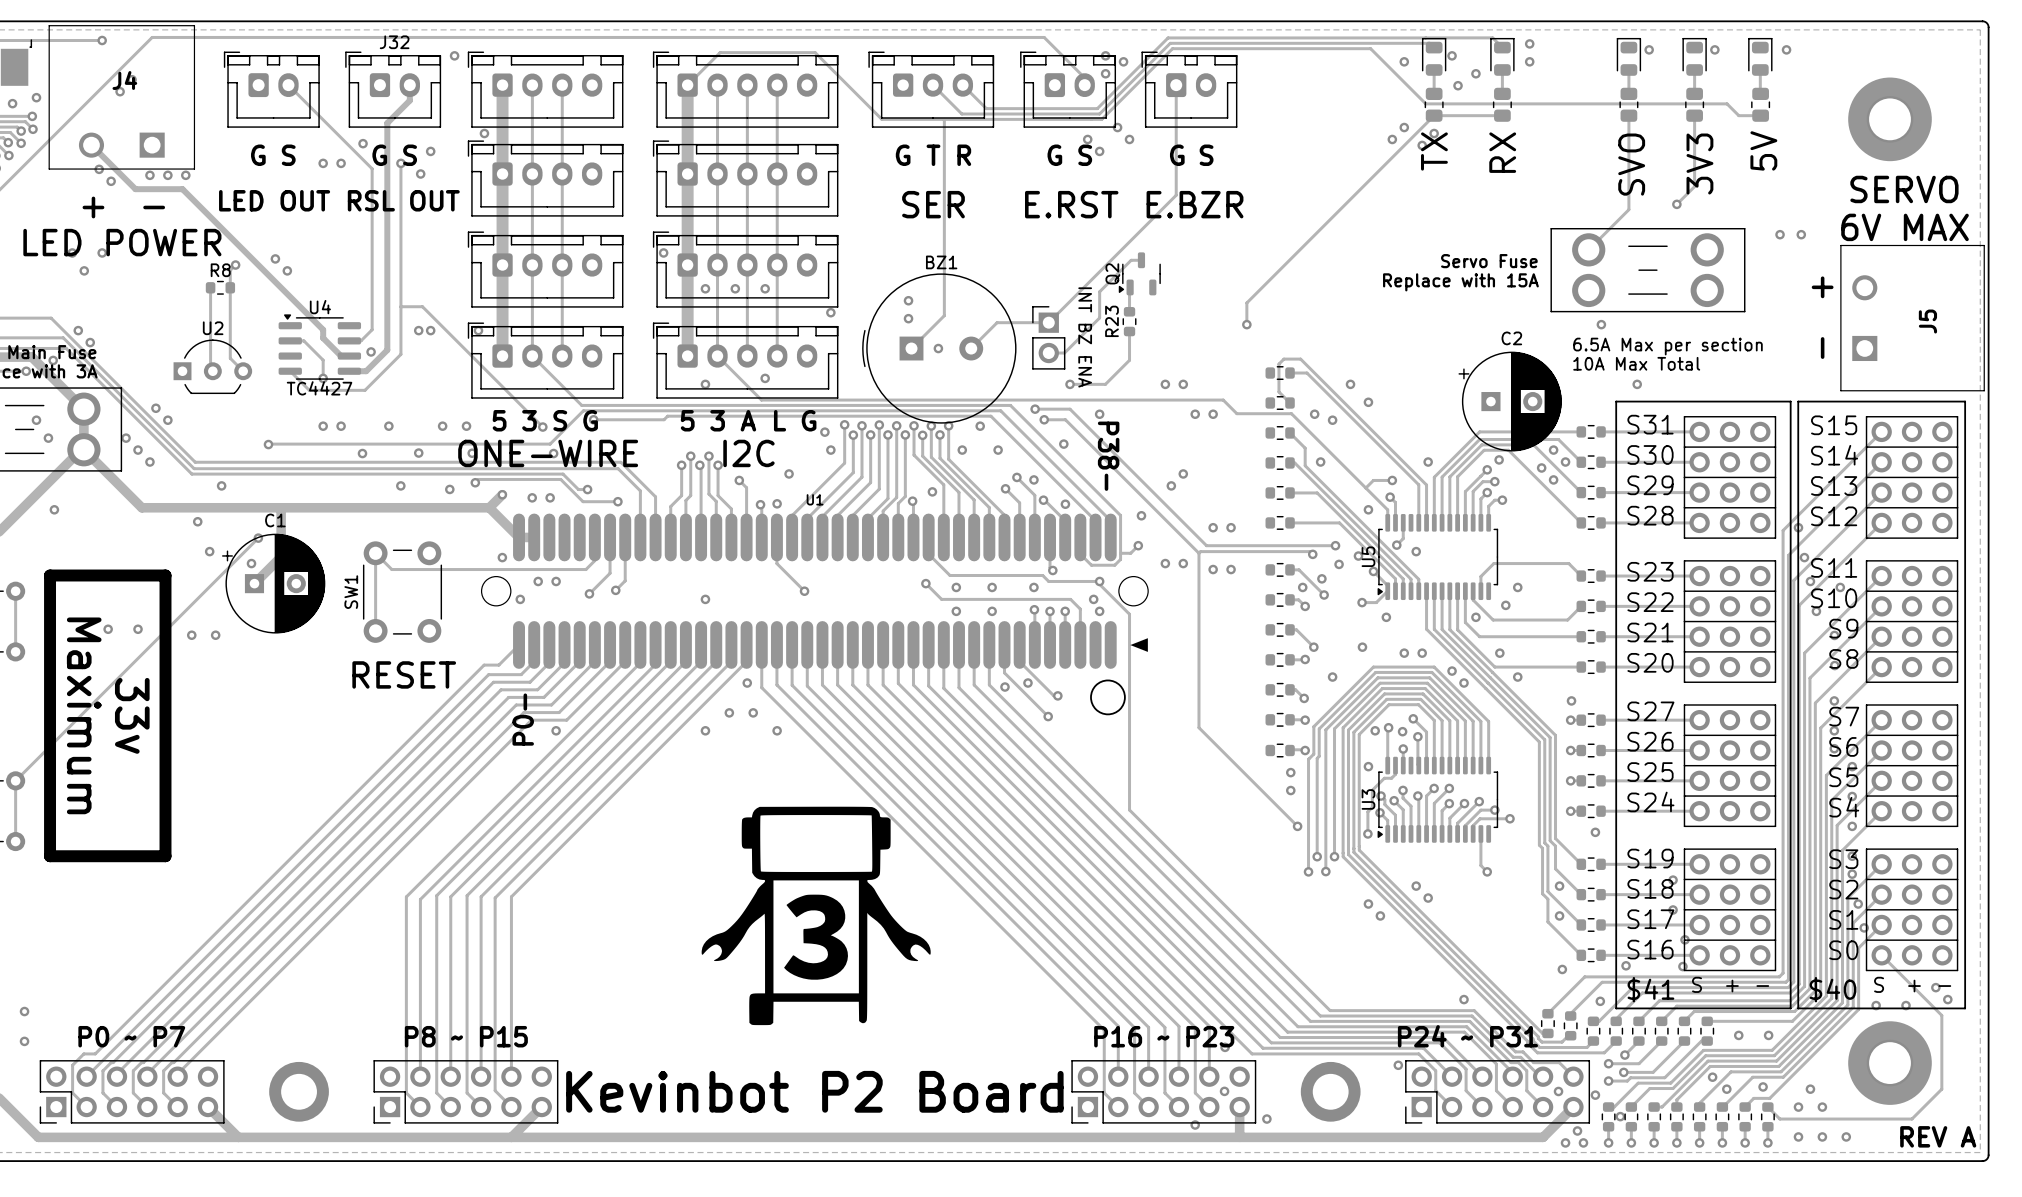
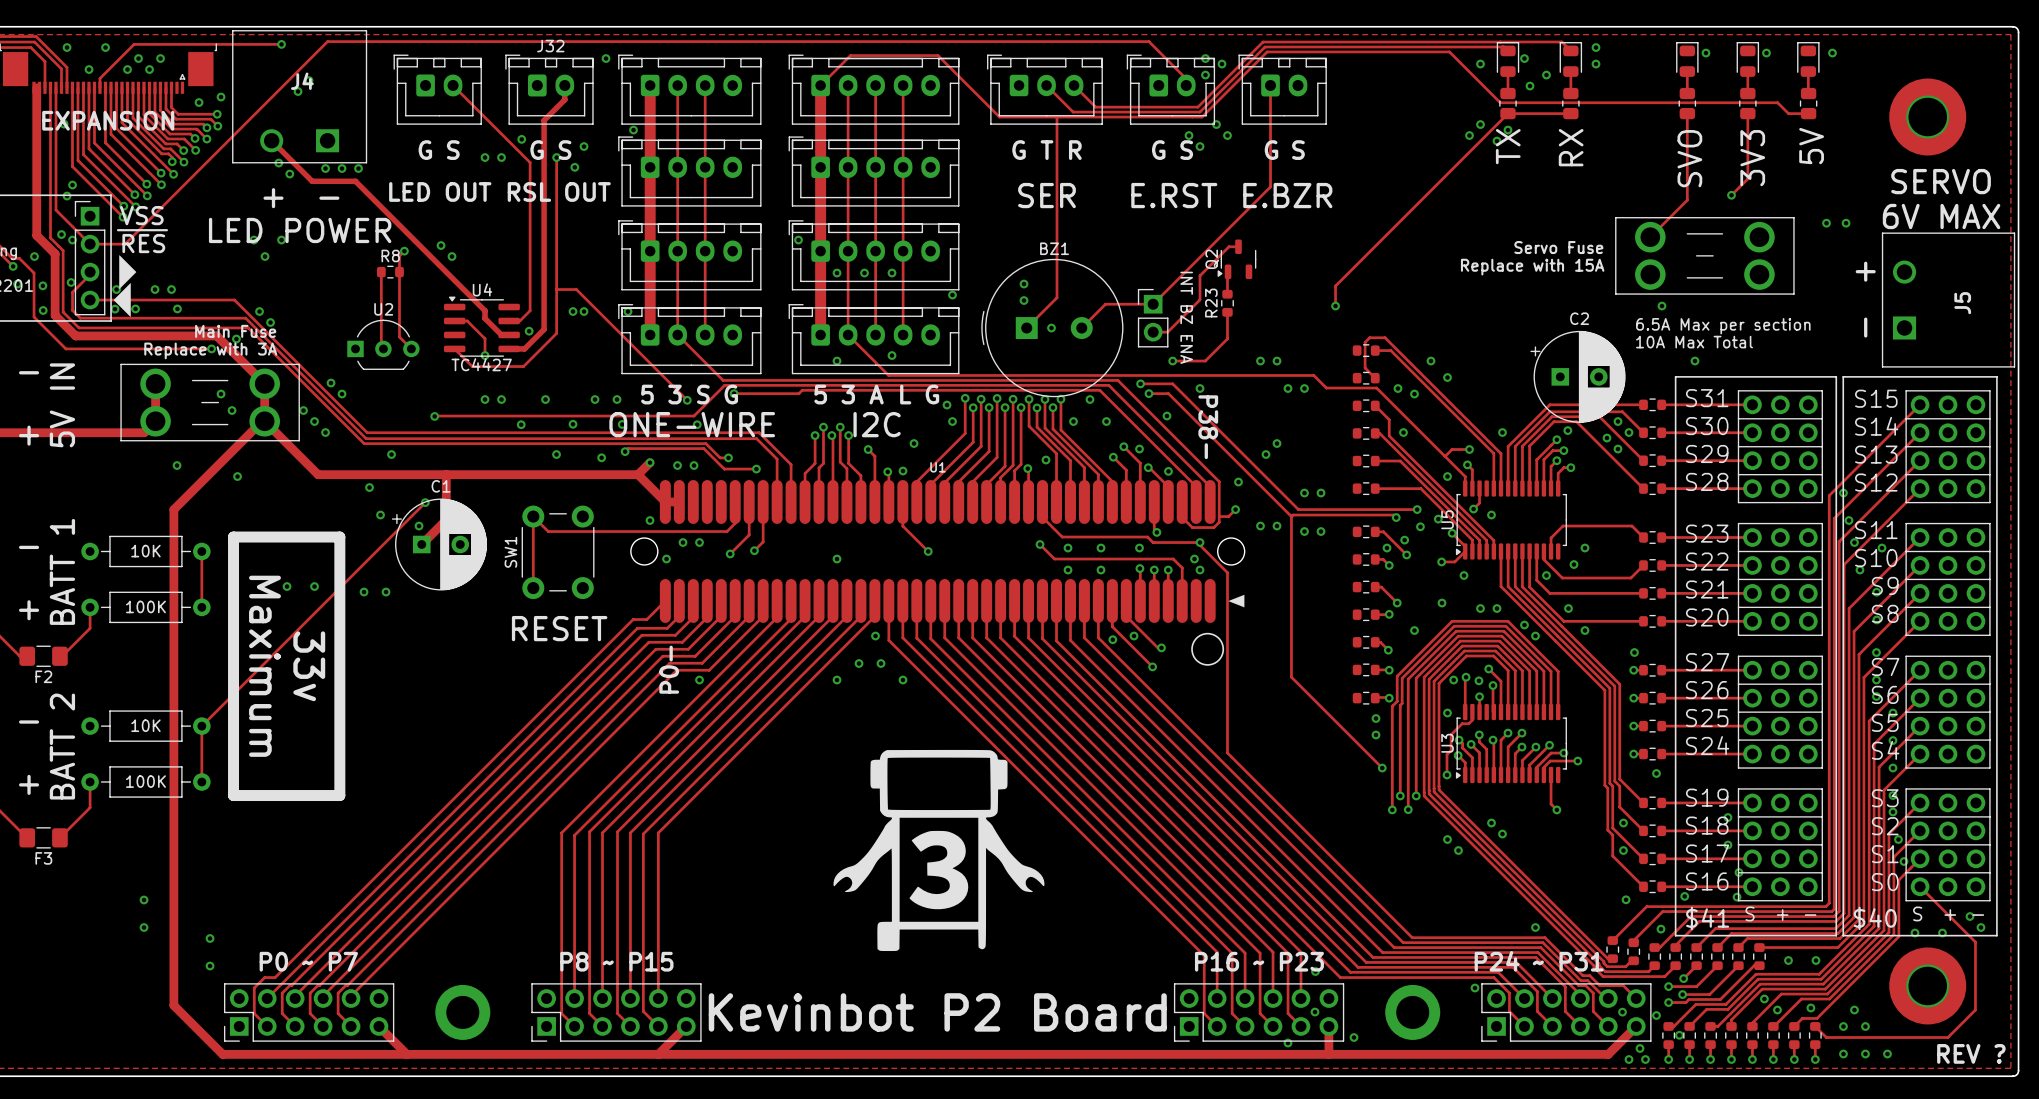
text: REV A (1938, 1136) -> REV ? (1971, 1053)

